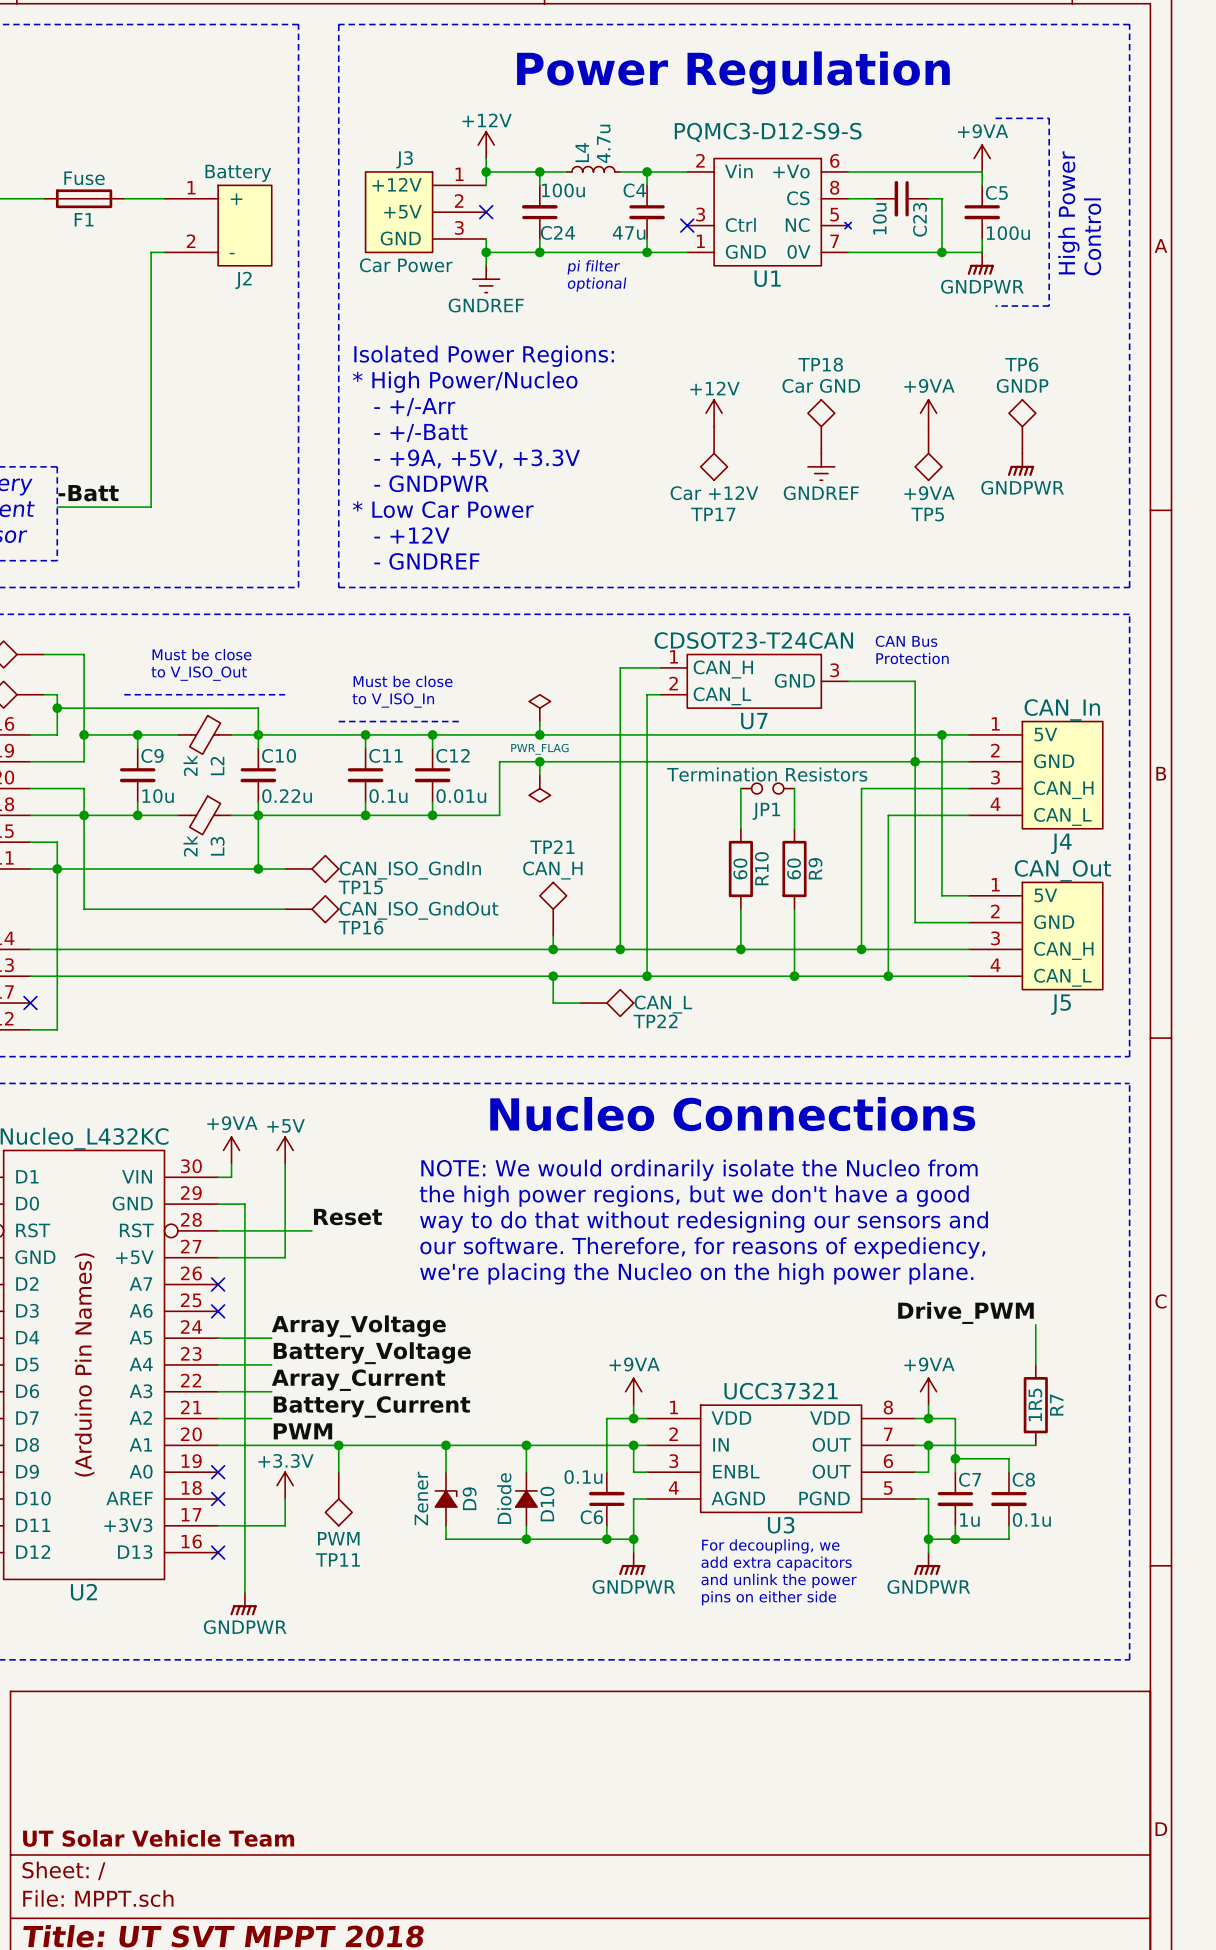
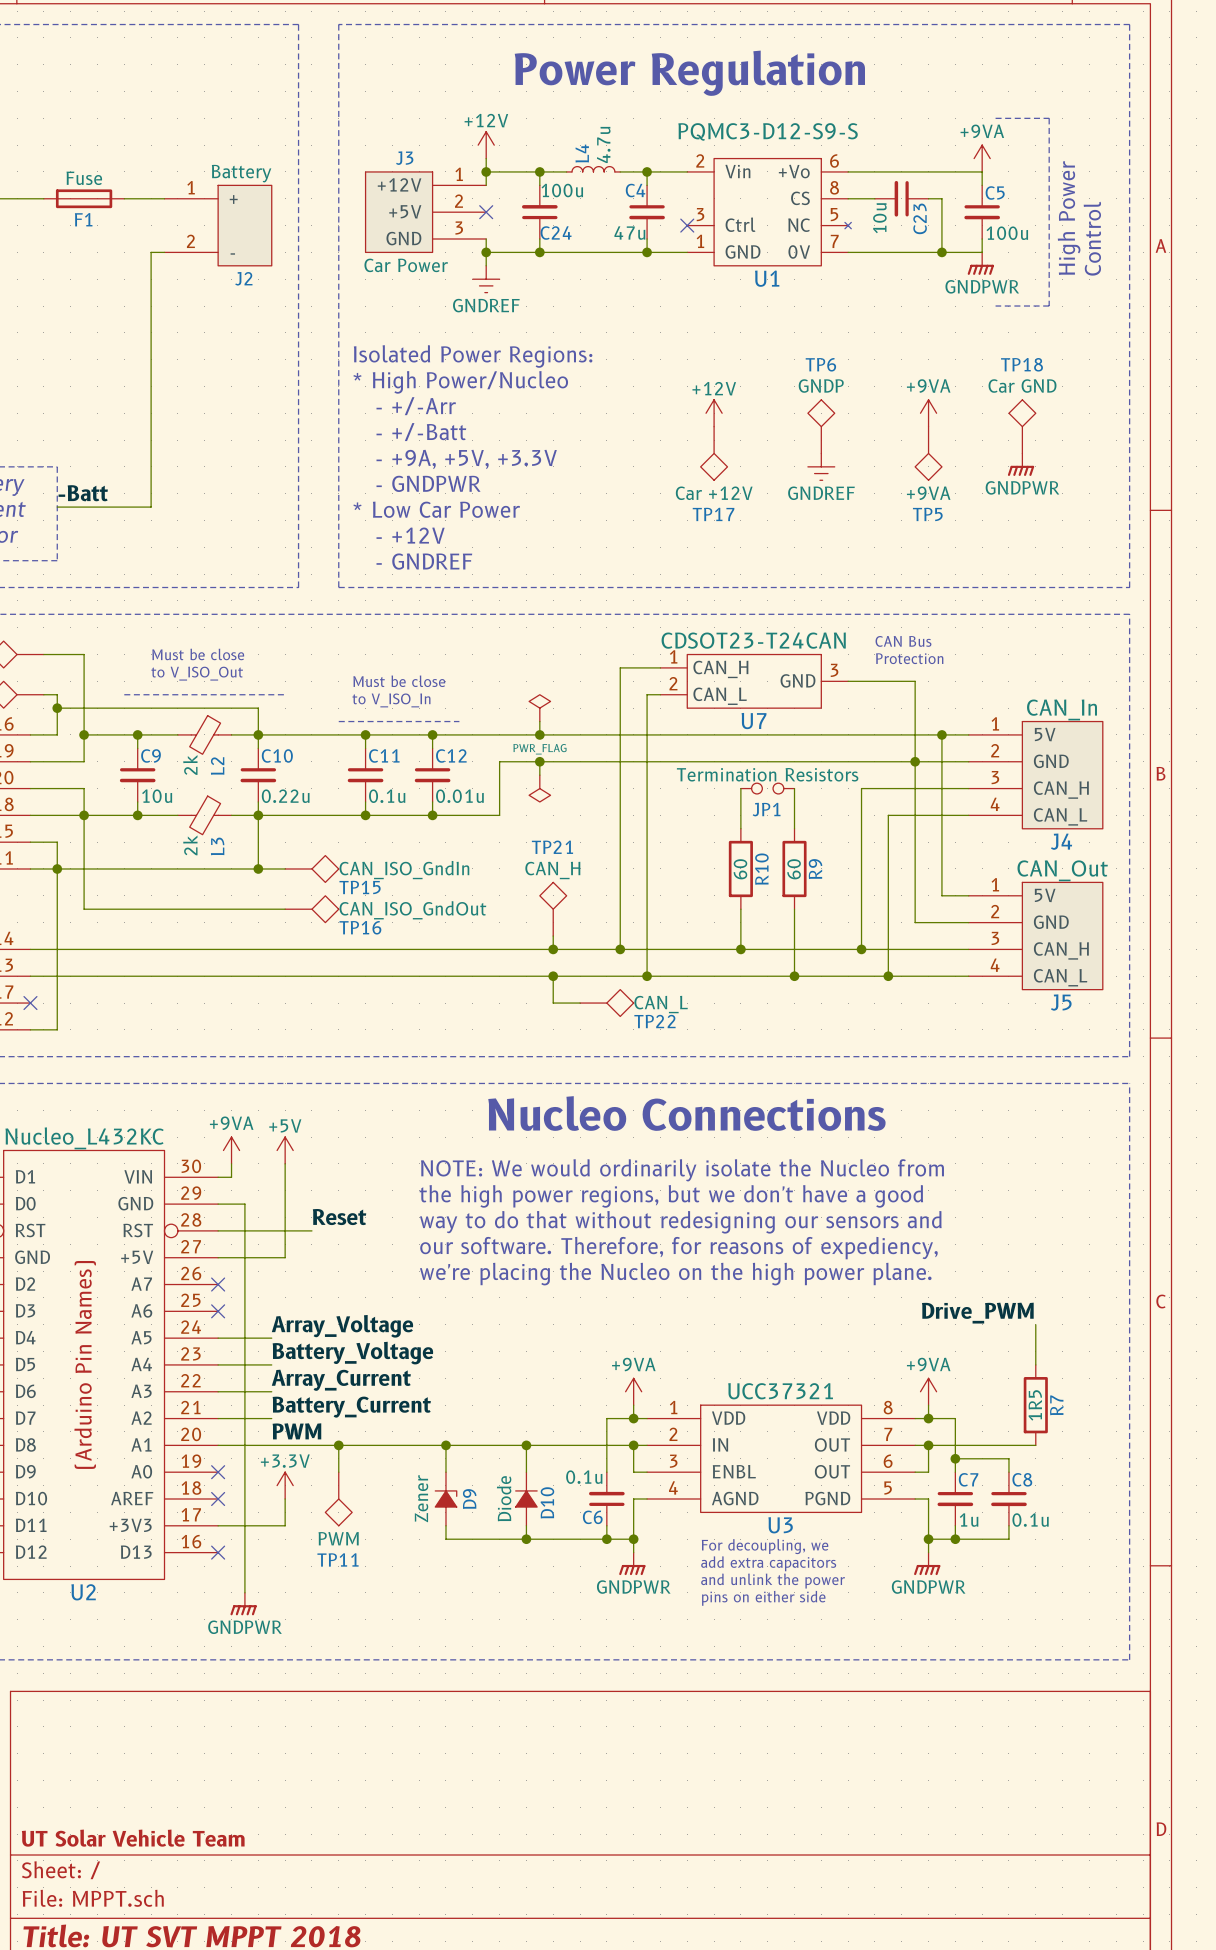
text: pi filter (593, 267) -> none
text: optional (596, 284) -> none
TP18 name: TP18 (820, 364) -> TP6 (820, 364)
TP6 name: TP6 (1021, 364) -> TP18 (1021, 364)
TP18 value: Car GND (821, 385) -> GNDP (821, 386)
TP6 value: GNDP (1022, 385) -> Car GND (1022, 386)

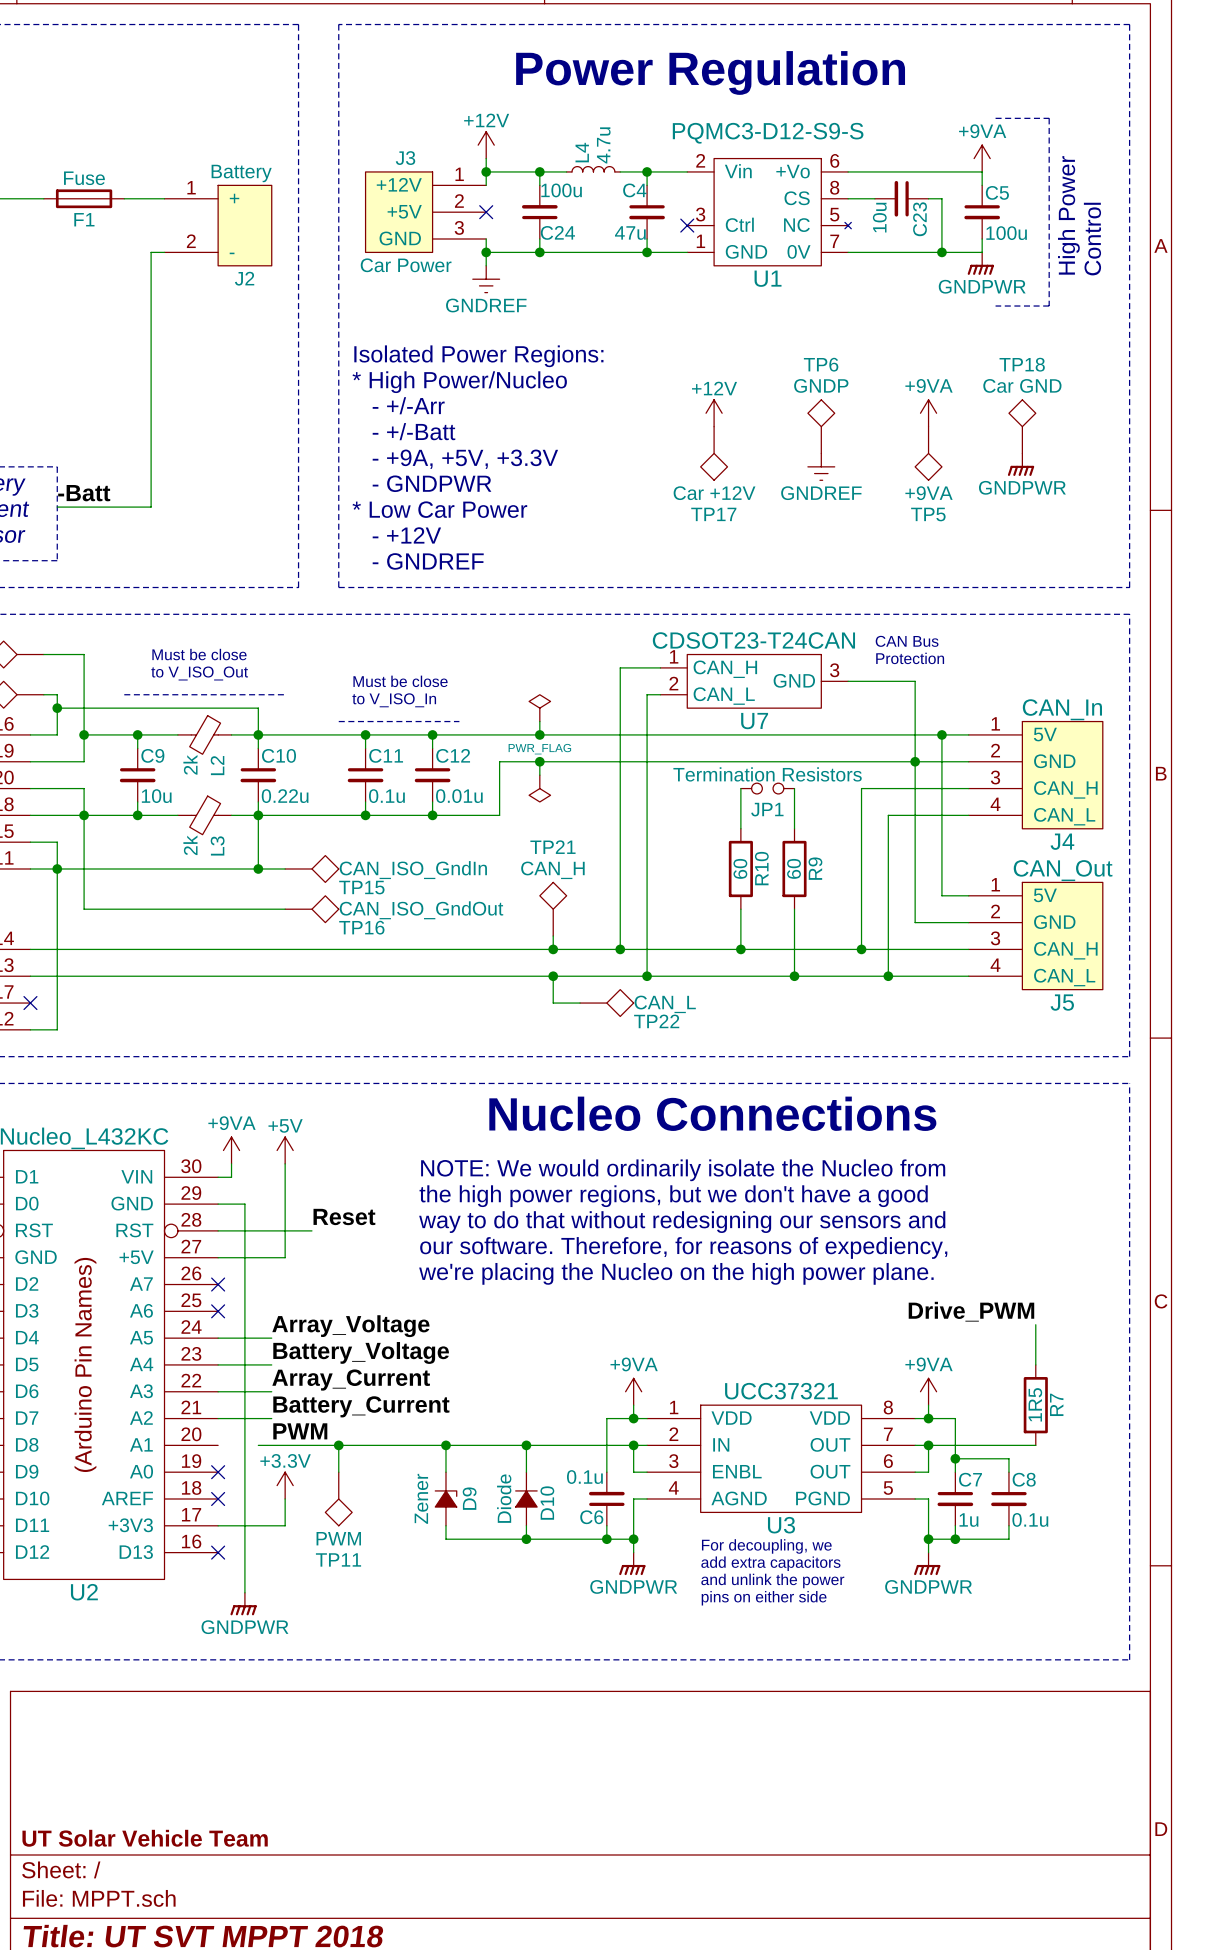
wire: (218, 1445) (258, 1445) -> none

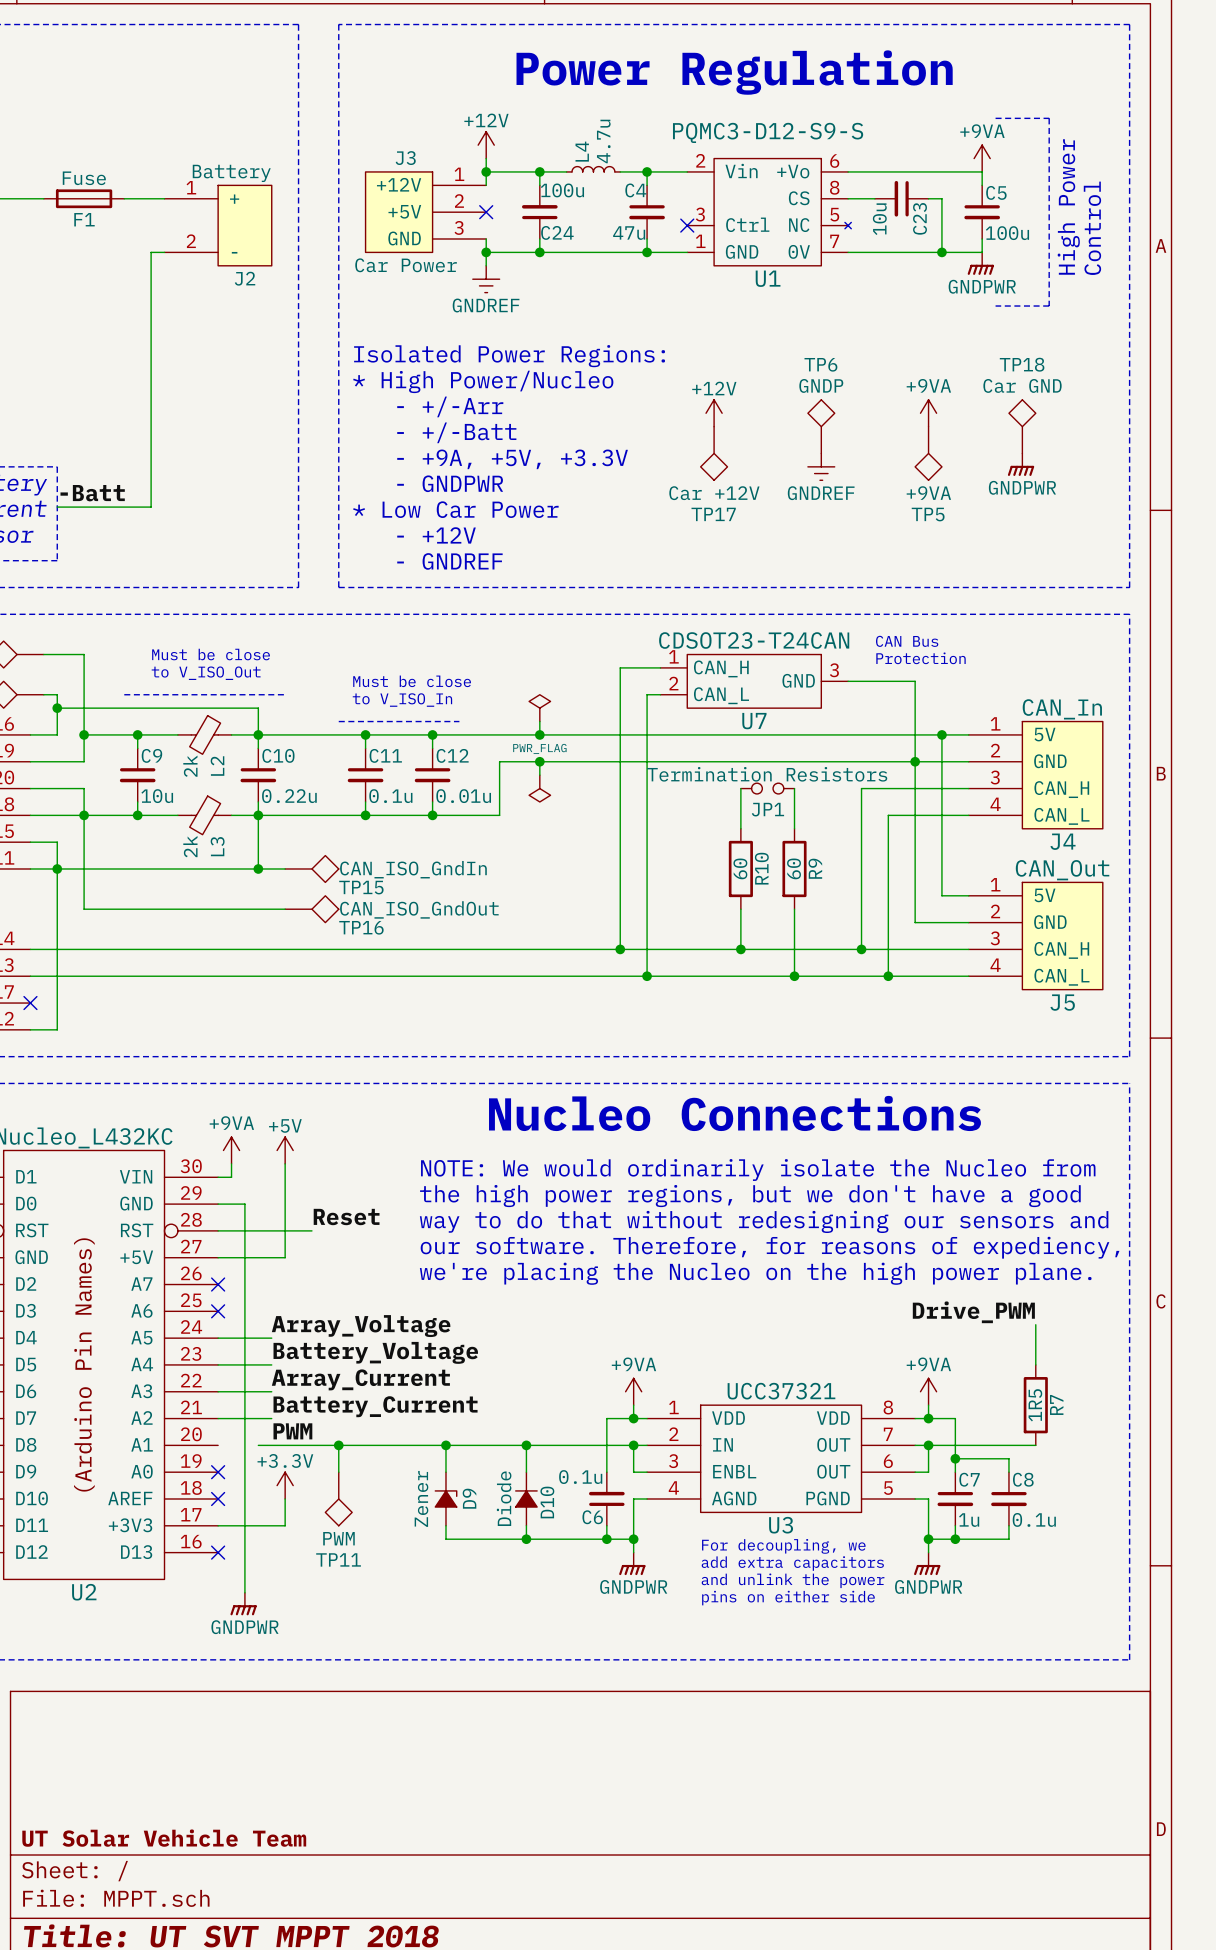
TP21: CAN_H (553, 909) -> none
wire: (553, 936) (553, 949) -> none
junction: (553, 949) -> none
wire: (553, 976) (553, 1003) (580, 1003) -> none
junction: (553, 976) -> none
TP22: CAN_L (606, 1003) -> none

